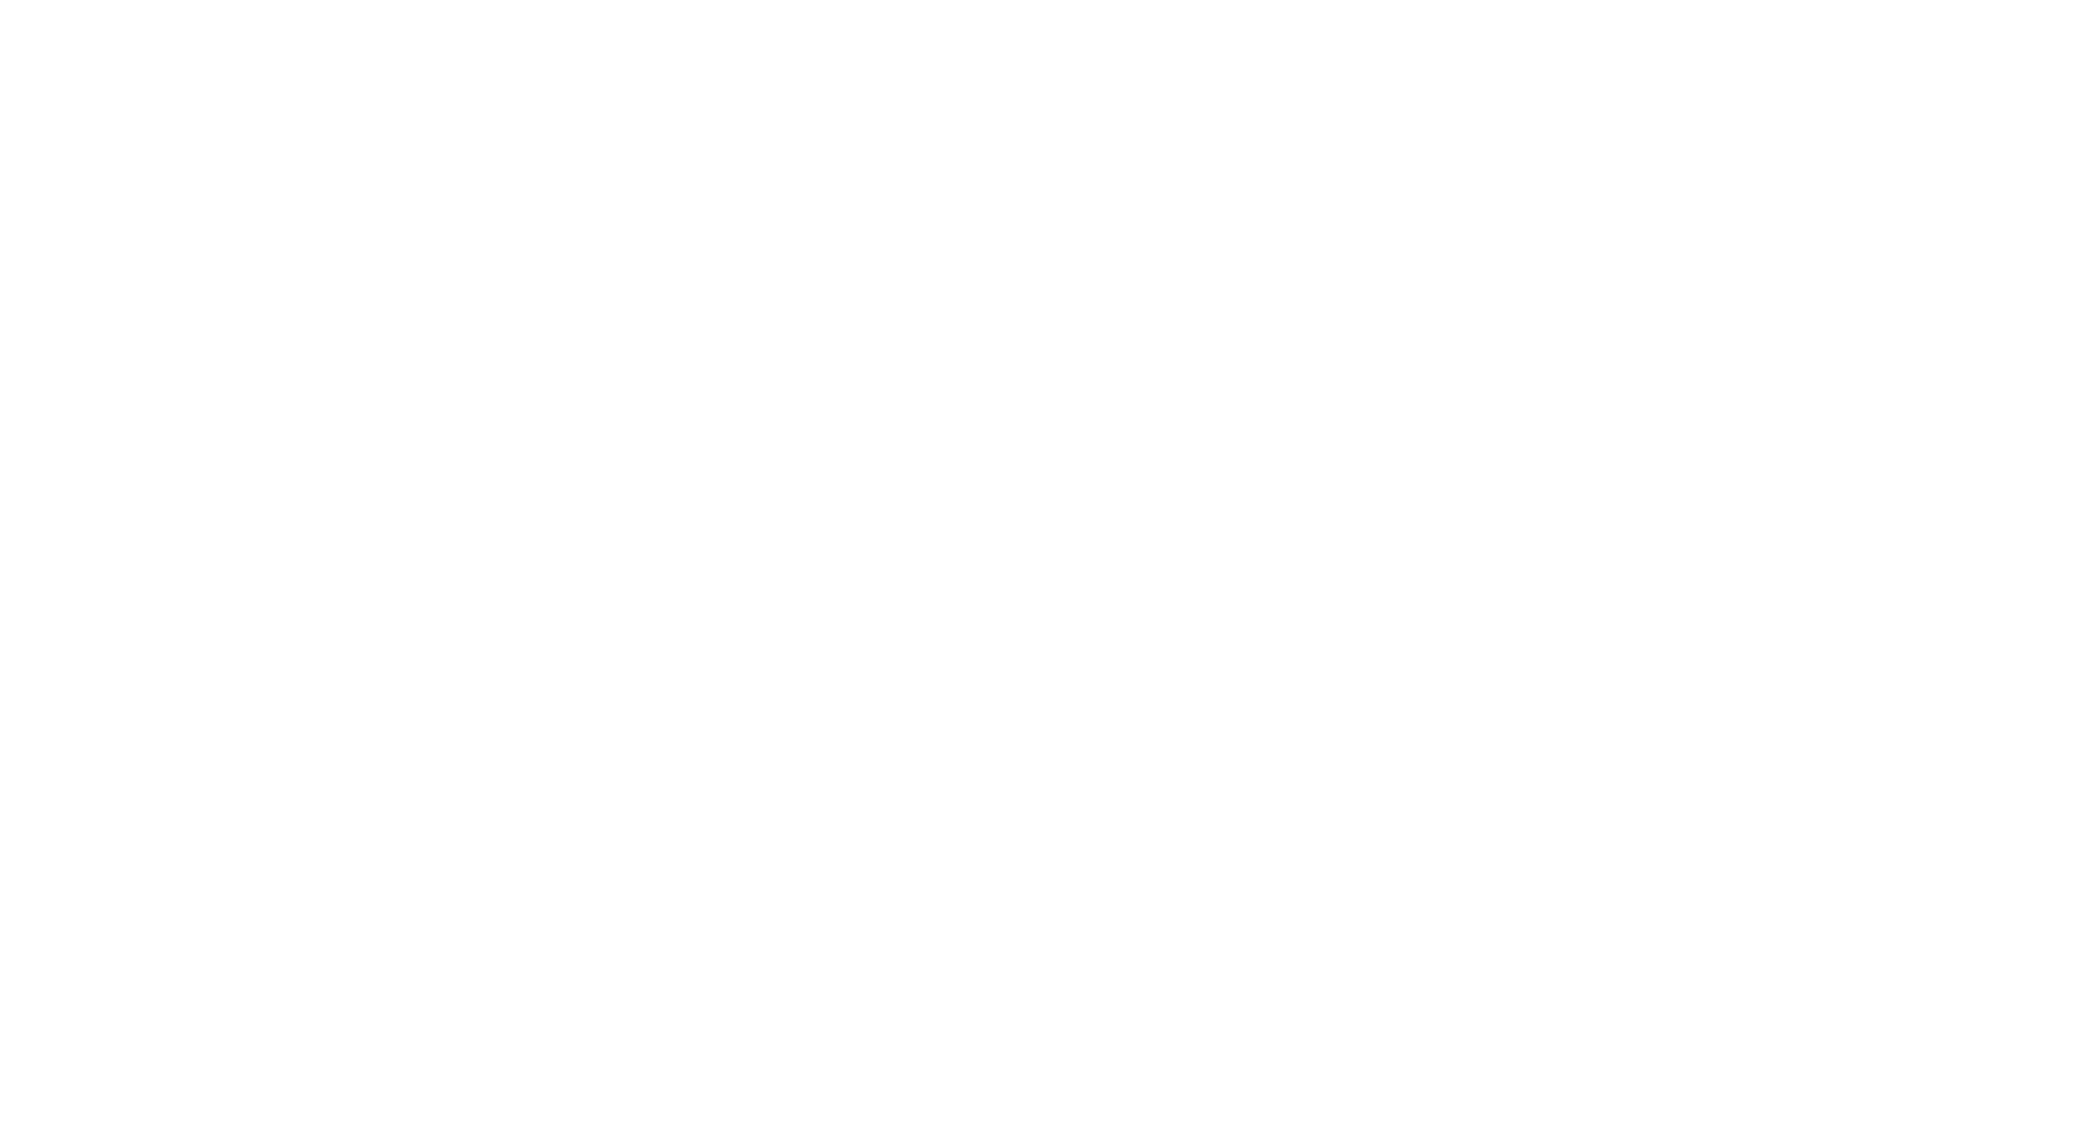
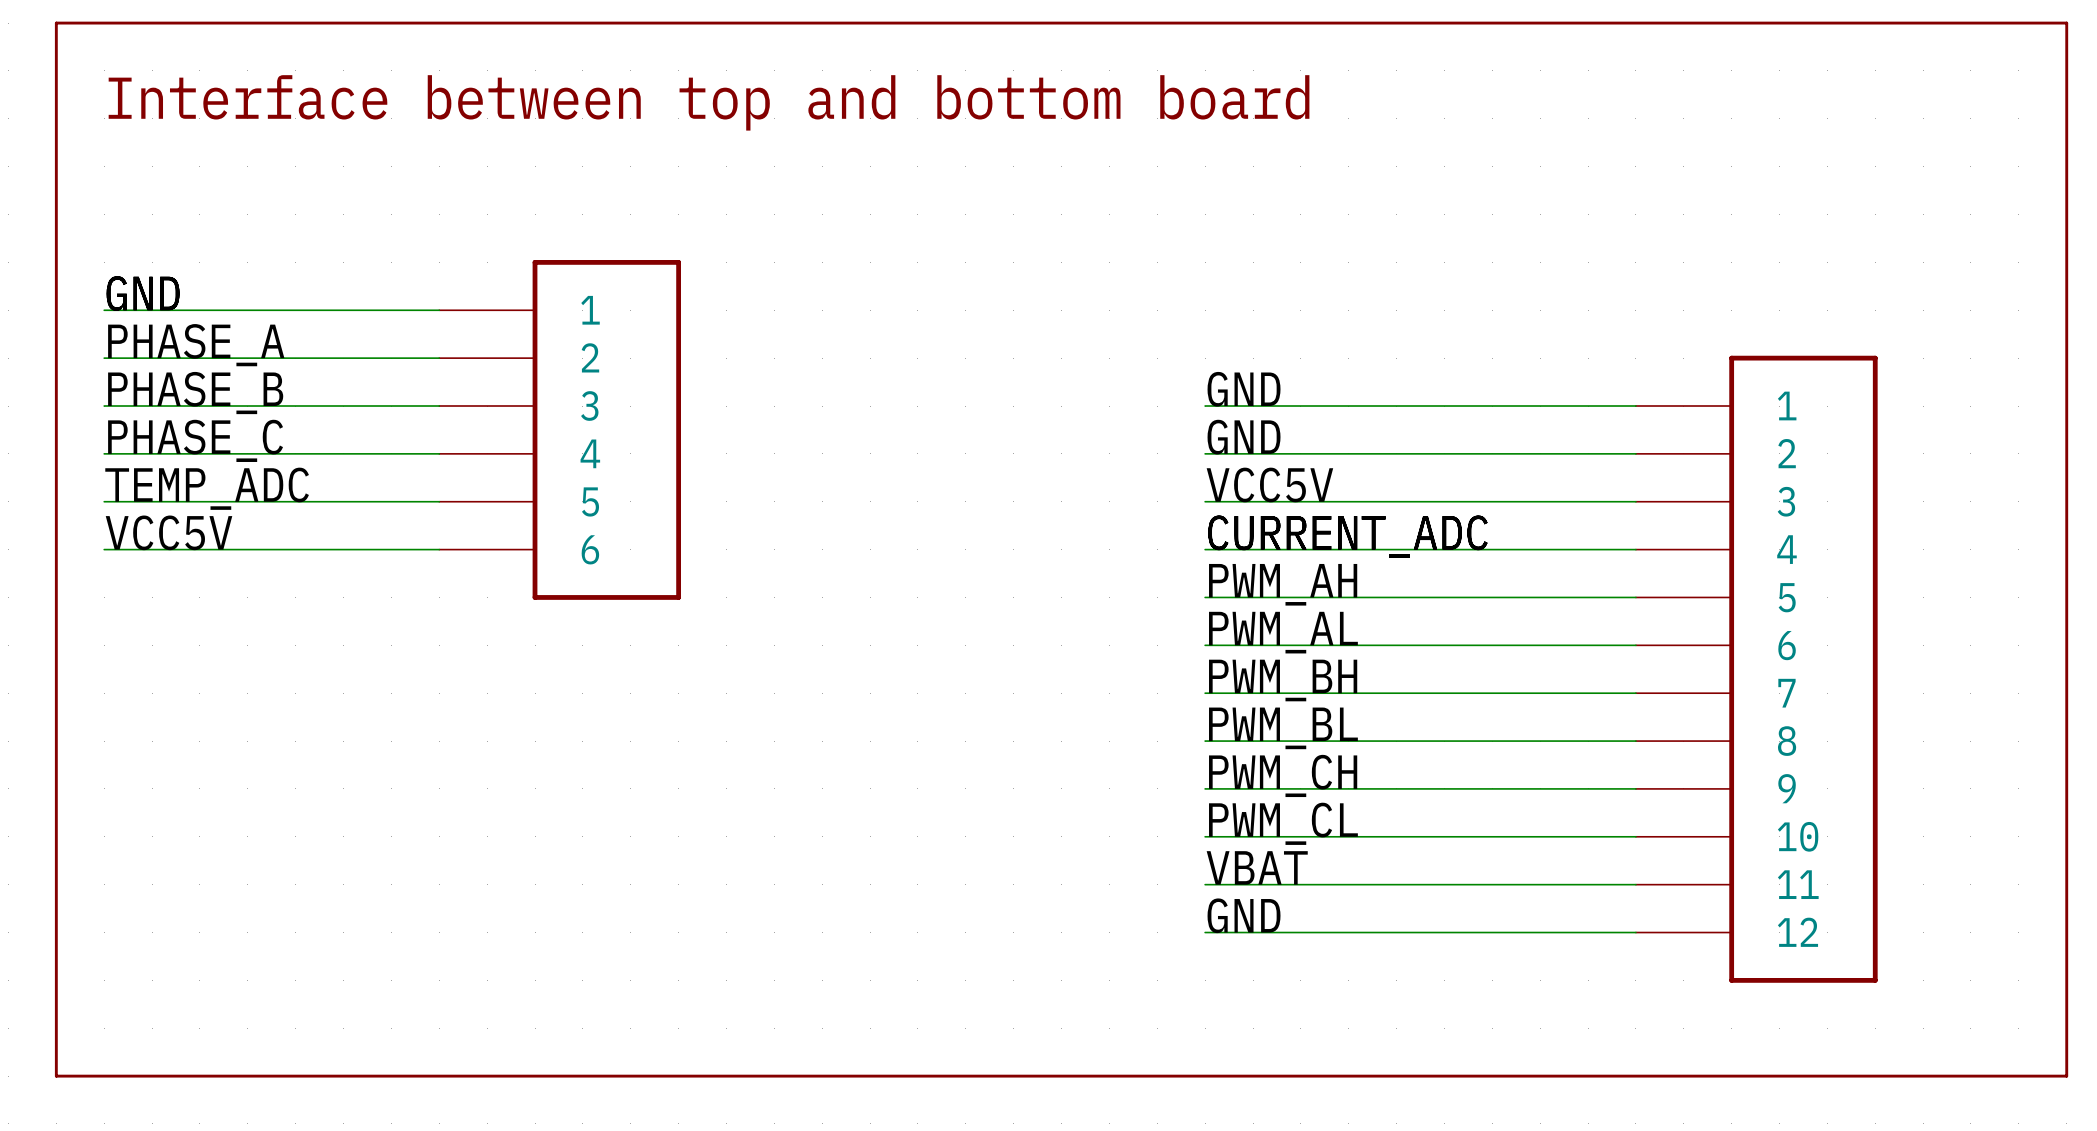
line: none -> (56, 23) (2066, 23) (2066, 1076) (56, 1076) (56, 23)
text: none -> Interface between top and bottom board (709, 102)
label: none -> GND (143, 293)
wire: none -> (104, 310) (439, 310)
label: none -> PHASE_A (196, 345)
wire: none -> (104, 358) (439, 358)
label: none -> GND (1244, 389)
label: none -> PHASE_B (195, 393)
wire: none -> (104, 406) (439, 406)
wire: none -> (1205, 406) (1635, 406)
part: none -> (560, 429)
label: none -> GND (1244, 437)
label: none -> PHASE_C (195, 440)
wire: none -> (104, 453) (439, 453)
wire: none -> (1205, 453) (1635, 453)
label: none -> VCC5V (1269, 484)
label: none -> TEMP_ADC (207, 488)
wire: none -> (104, 501) (439, 501)
wire: none -> (1205, 501) (1635, 501)
label: none -> VCC5V (169, 532)
label: none -> CURRENT_ADC (1347, 536)
wire: none -> (104, 549) (439, 549)
wire: none -> (1205, 549) (1635, 549)
label: none -> PWM_AH (1283, 584)
wire: none -> (1205, 597) (1635, 597)
label: none -> PWM_AL (1283, 632)
wire: none -> (1205, 645) (1635, 645)
part: none -> (1756, 669)
label: none -> PWM_BH (1283, 680)
wire: none -> (1205, 693) (1635, 693)
label: none -> PWM_BL (1283, 728)
wire: none -> (1205, 741) (1635, 741)
label: none -> PWM_CH (1283, 775)
wire: none -> (1205, 788) (1635, 788)
label: none -> PWM_CL (1283, 823)
wire: none -> (1205, 836) (1635, 836)
label: none -> VBAT (1257, 867)
wire: none -> (1205, 884) (1635, 884)
label: none -> GND (1244, 915)
wire: none -> (1205, 932) (1635, 932)

